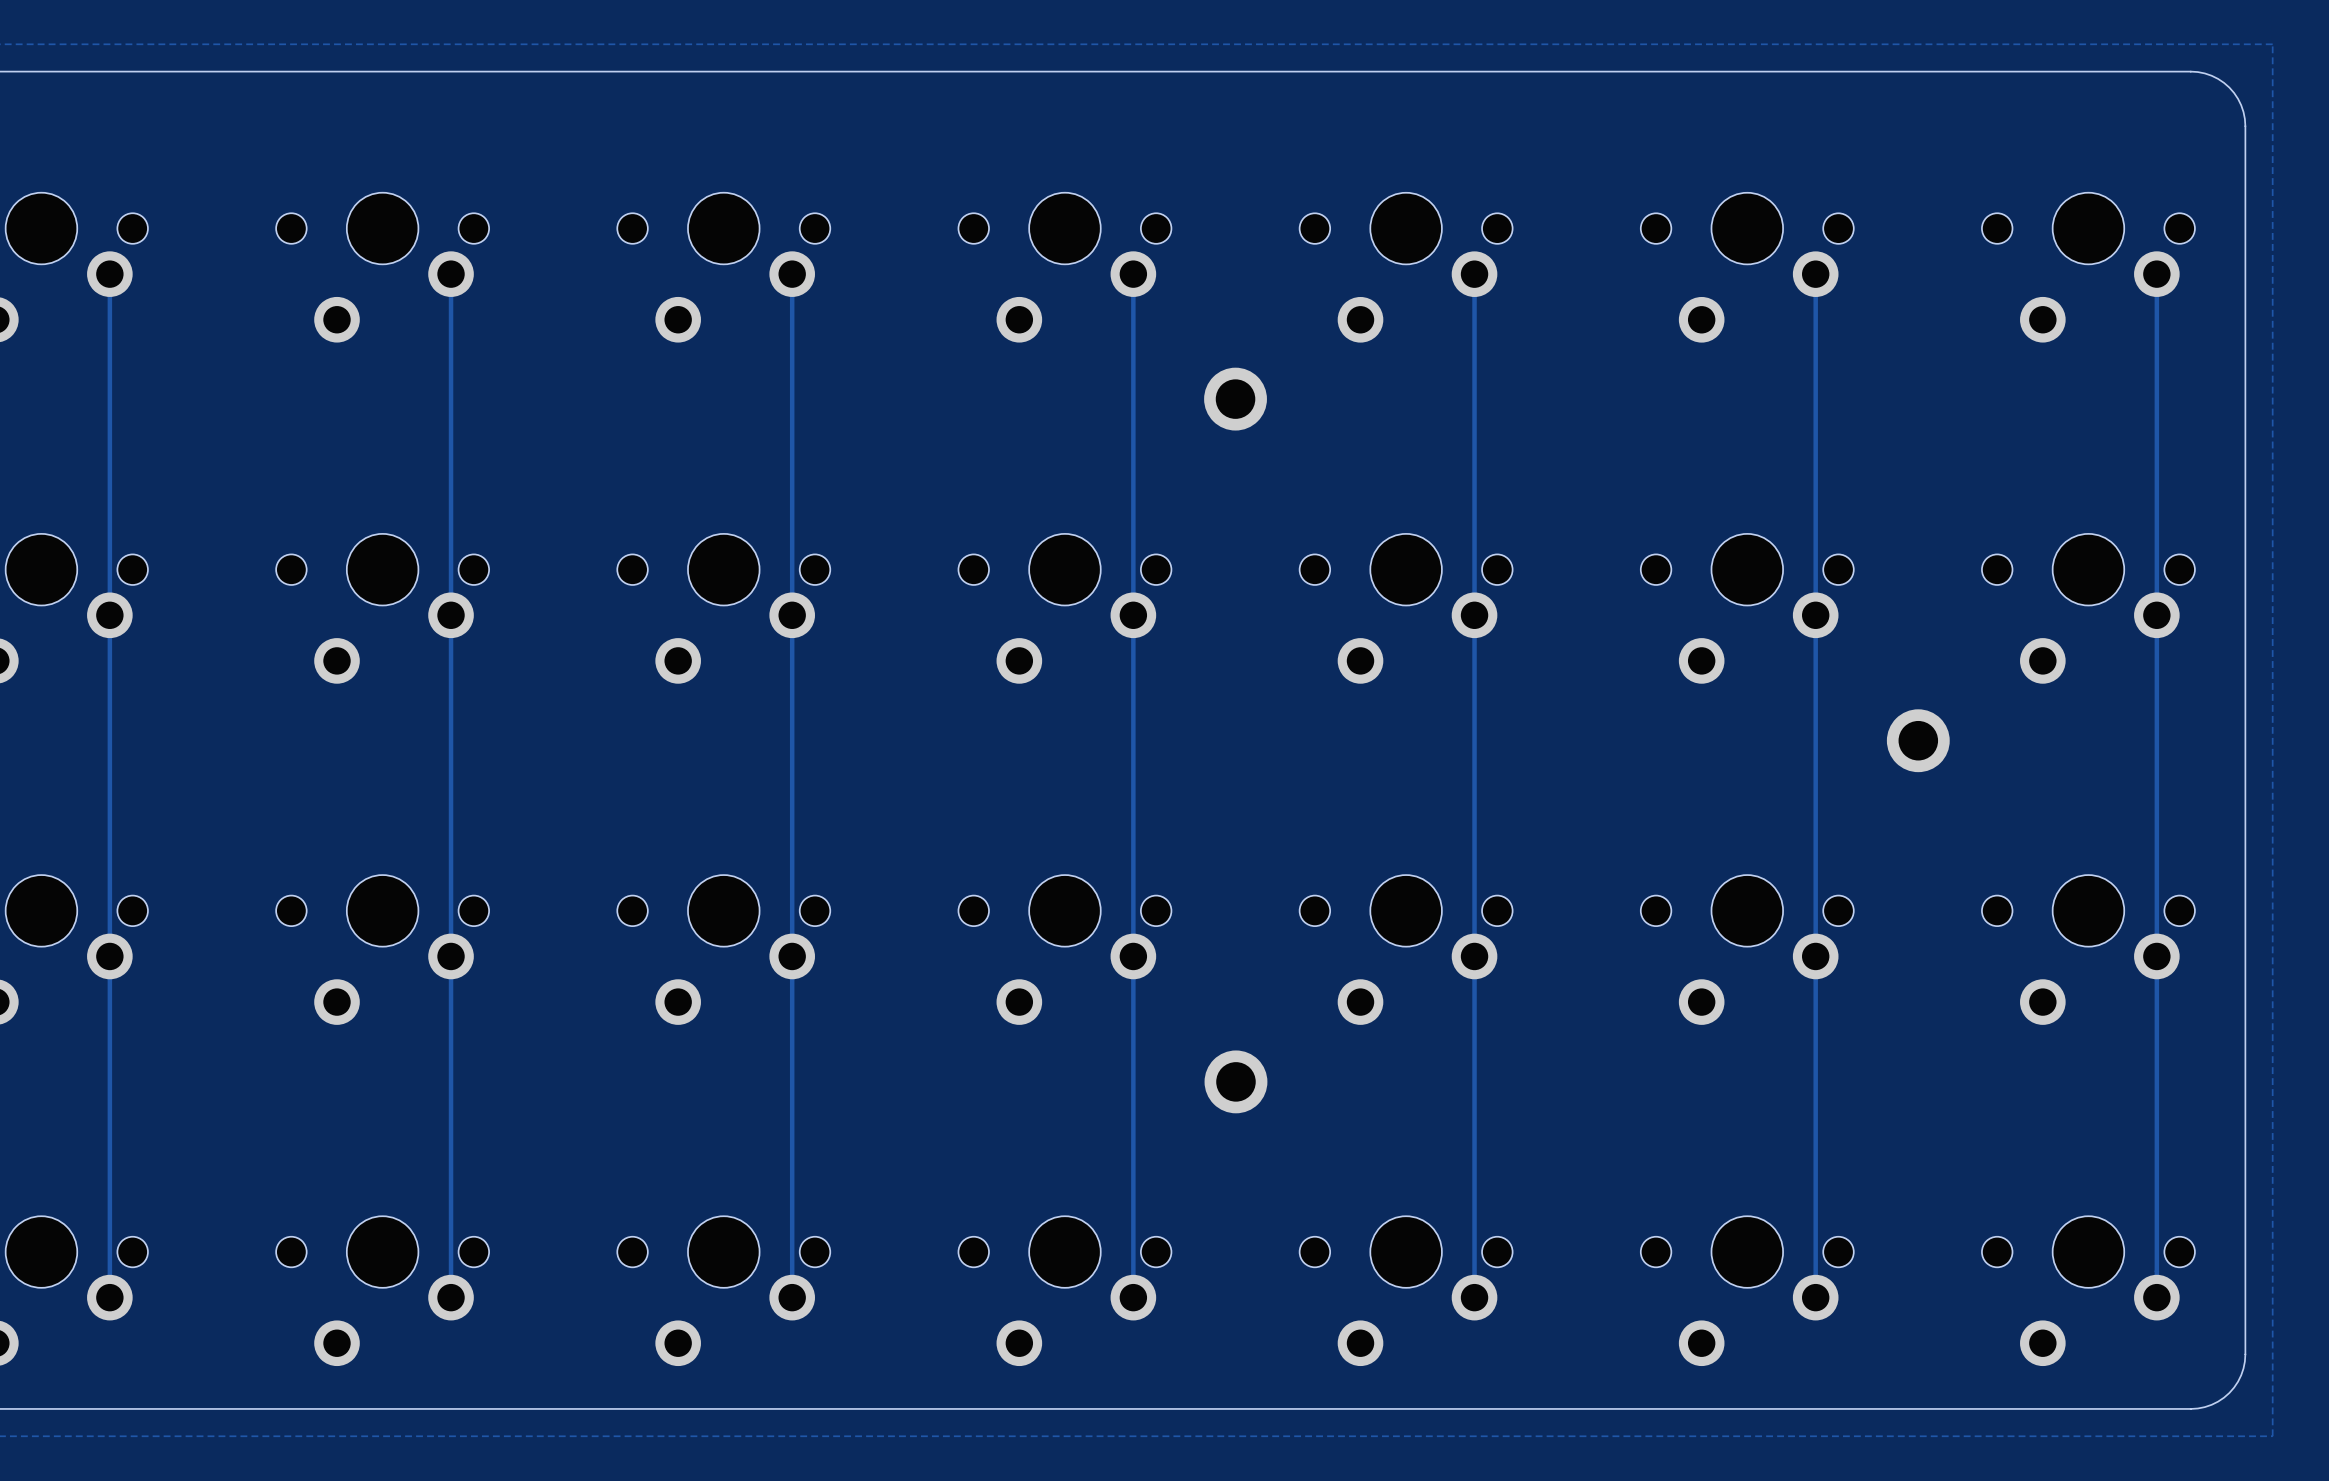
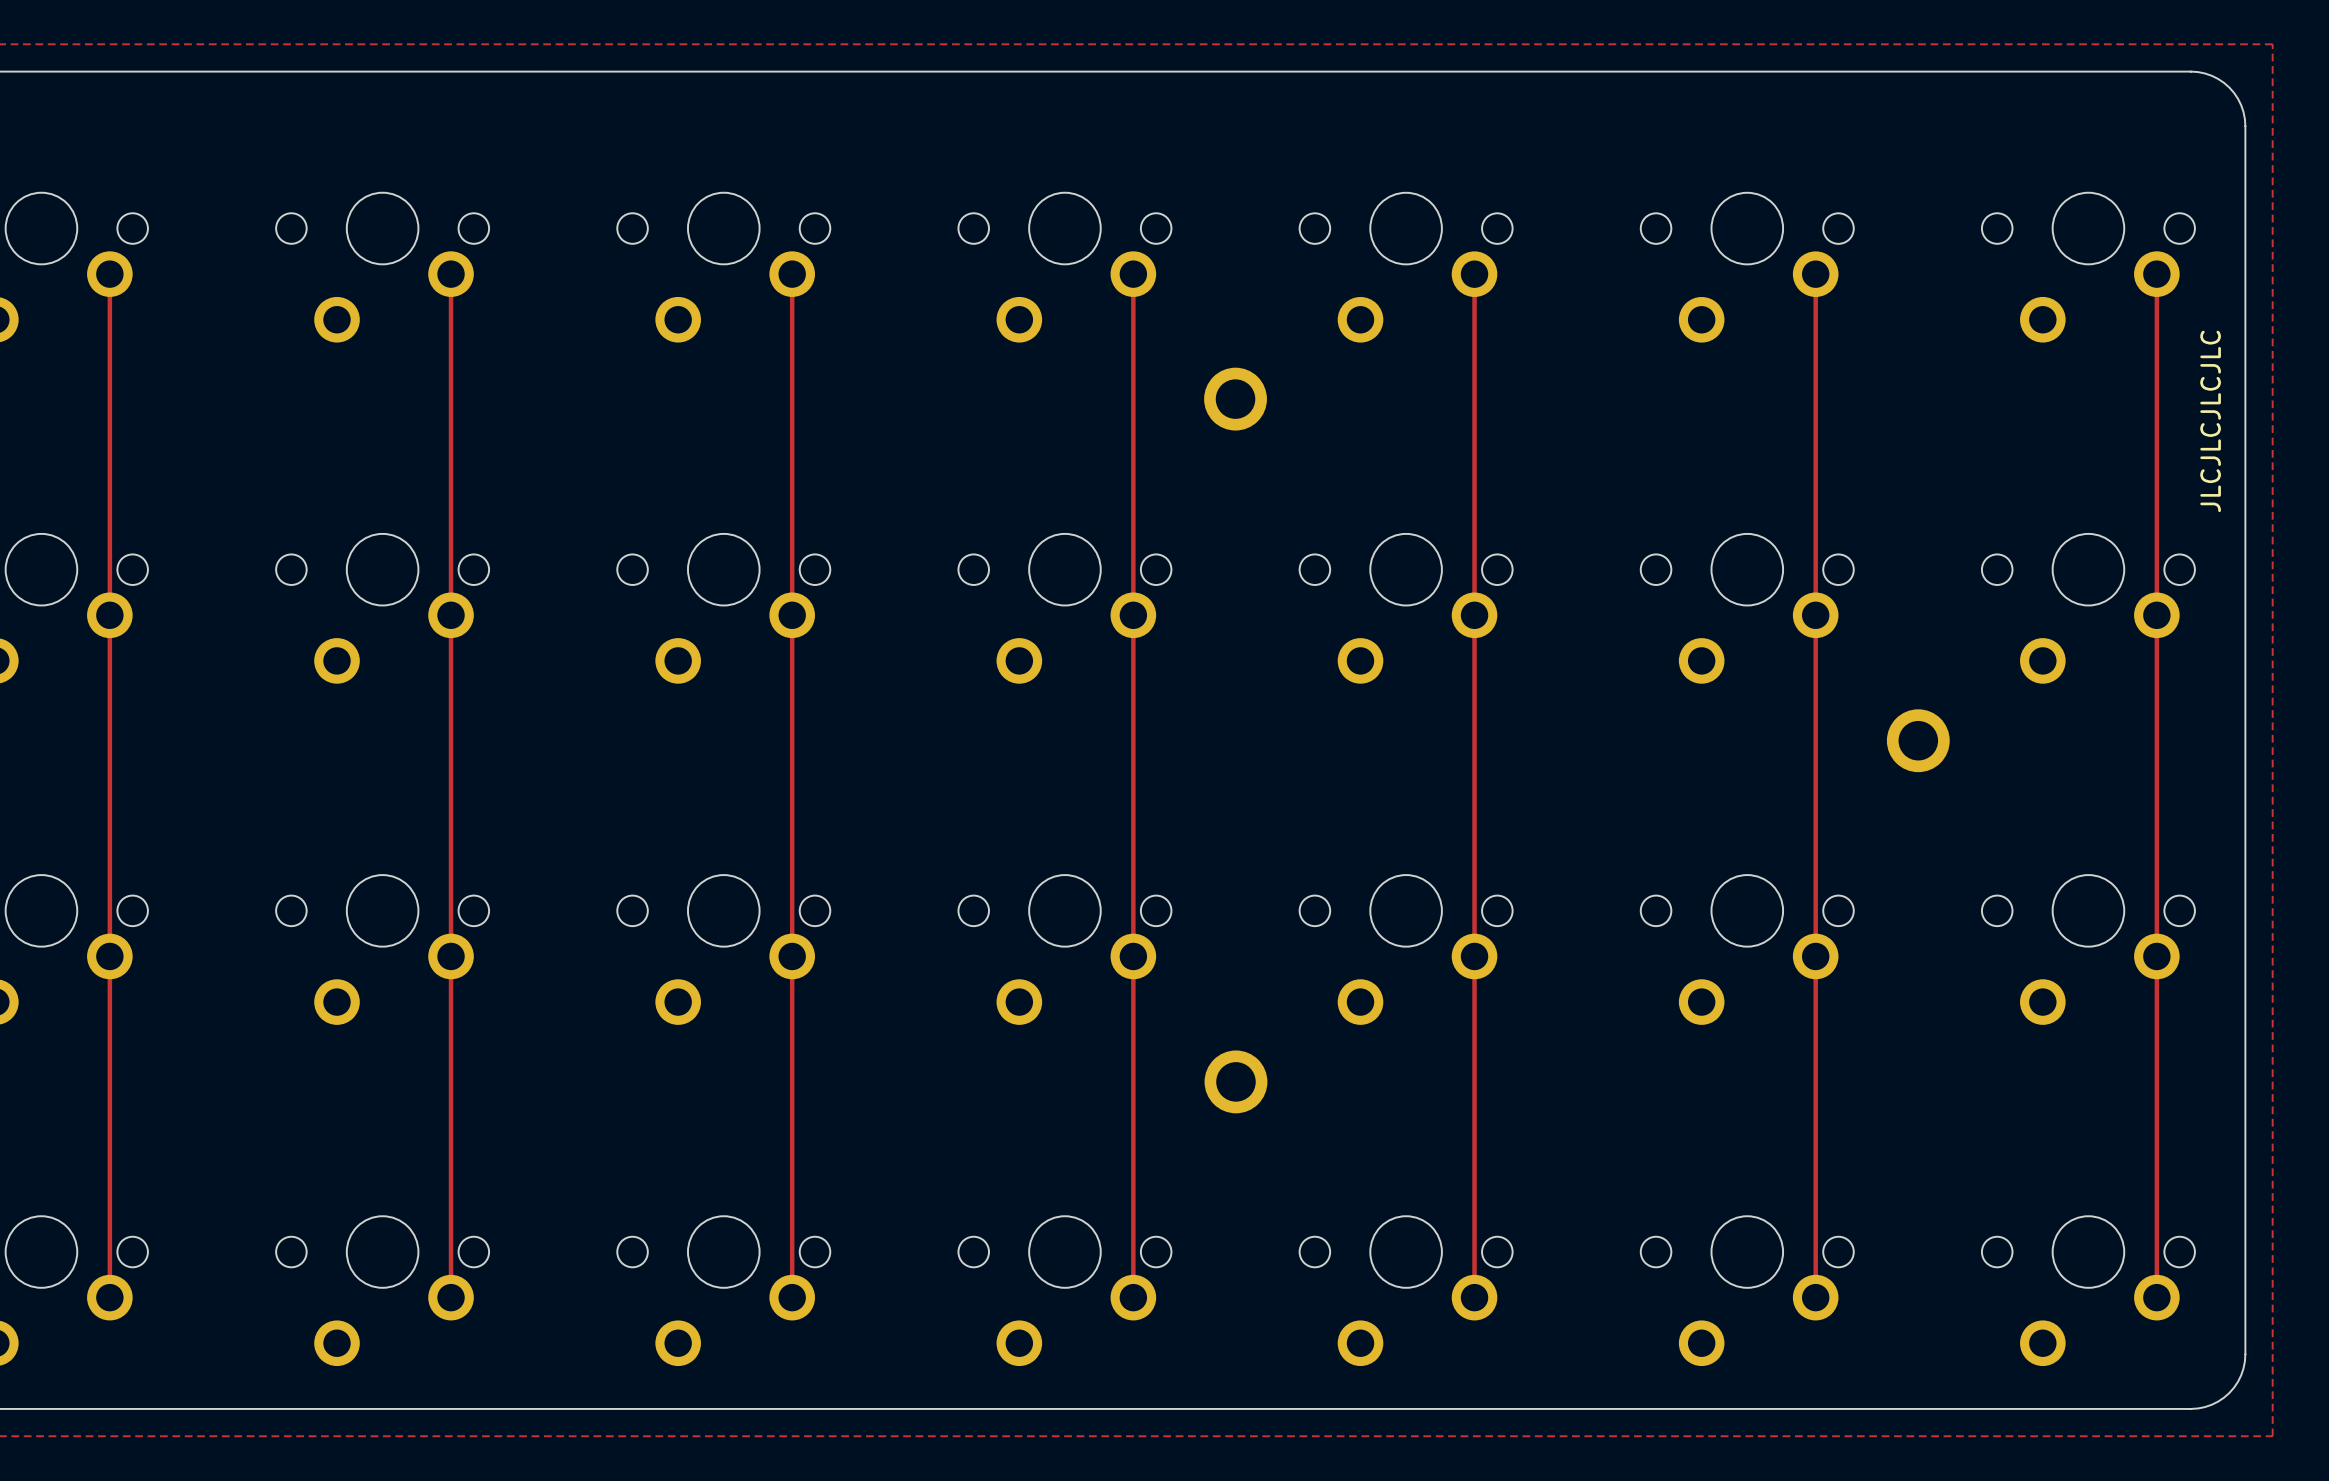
text: none -> JLCJLCJLCJLC (2210, 421)

